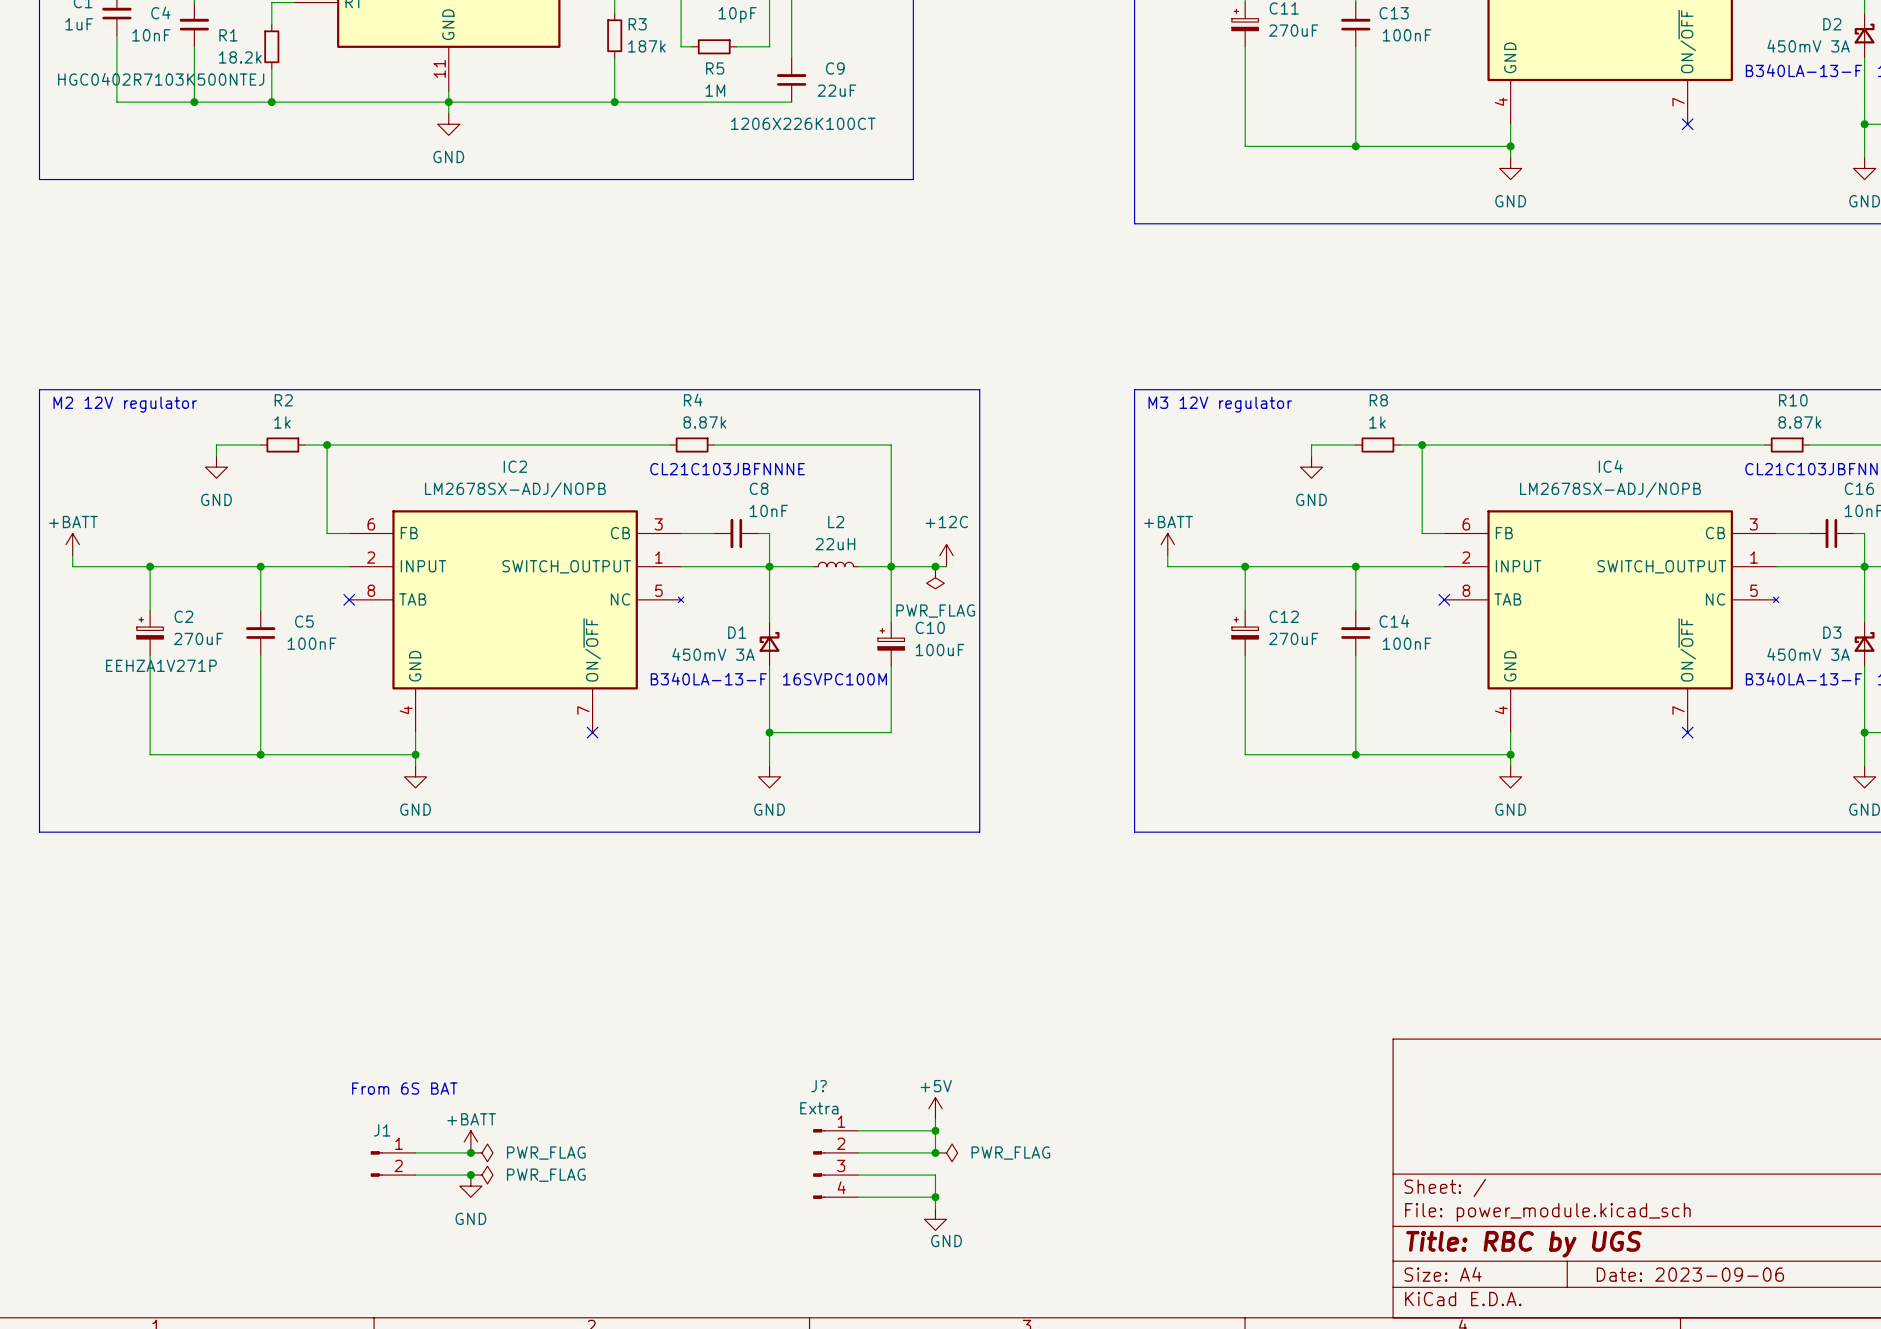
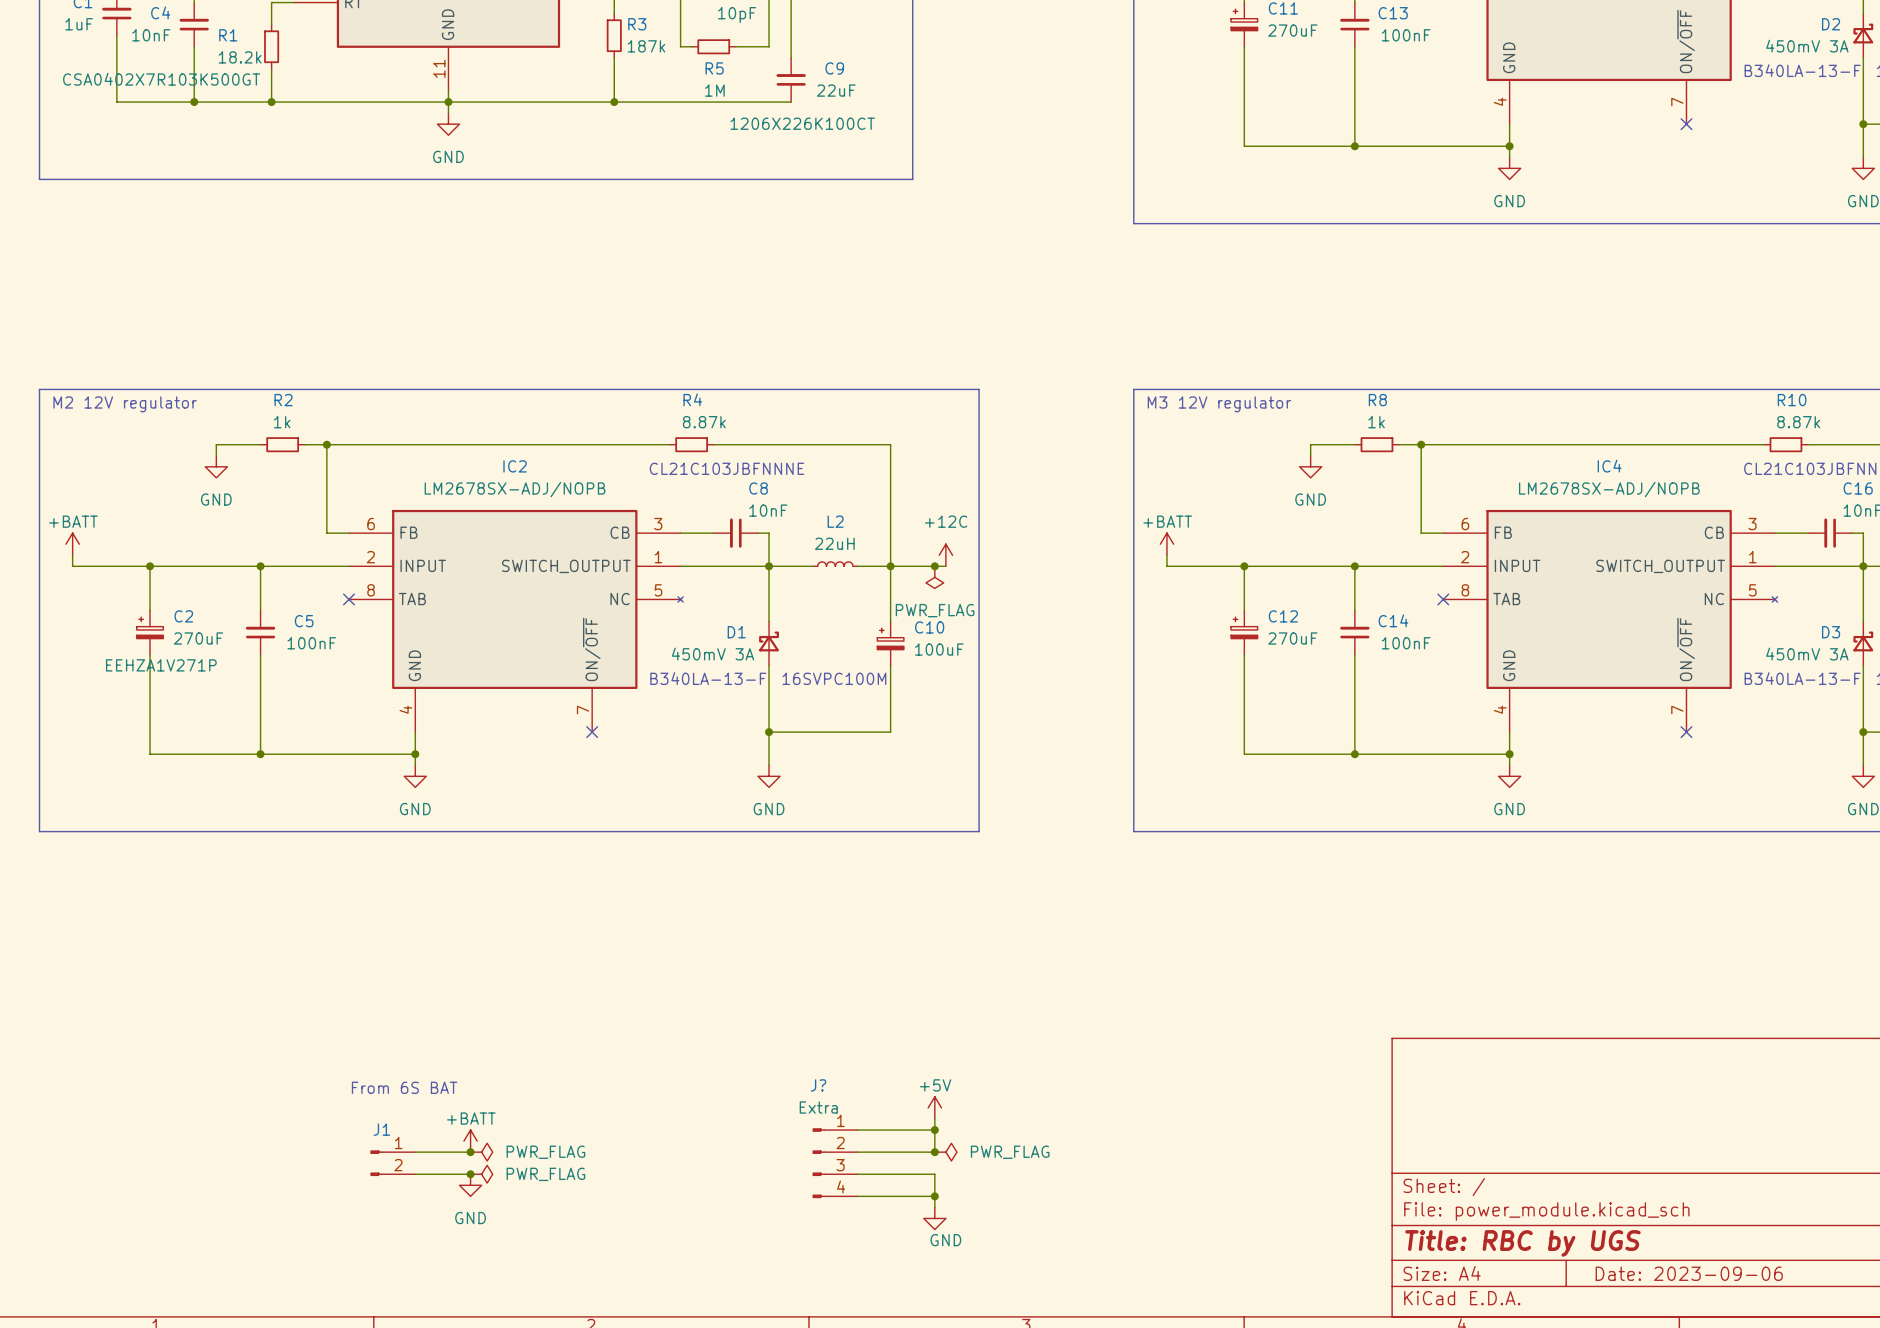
C4 text: HGC0402R7103K500NTEJ (161, 79) -> CSA0402X7R103K500GT (161, 79)

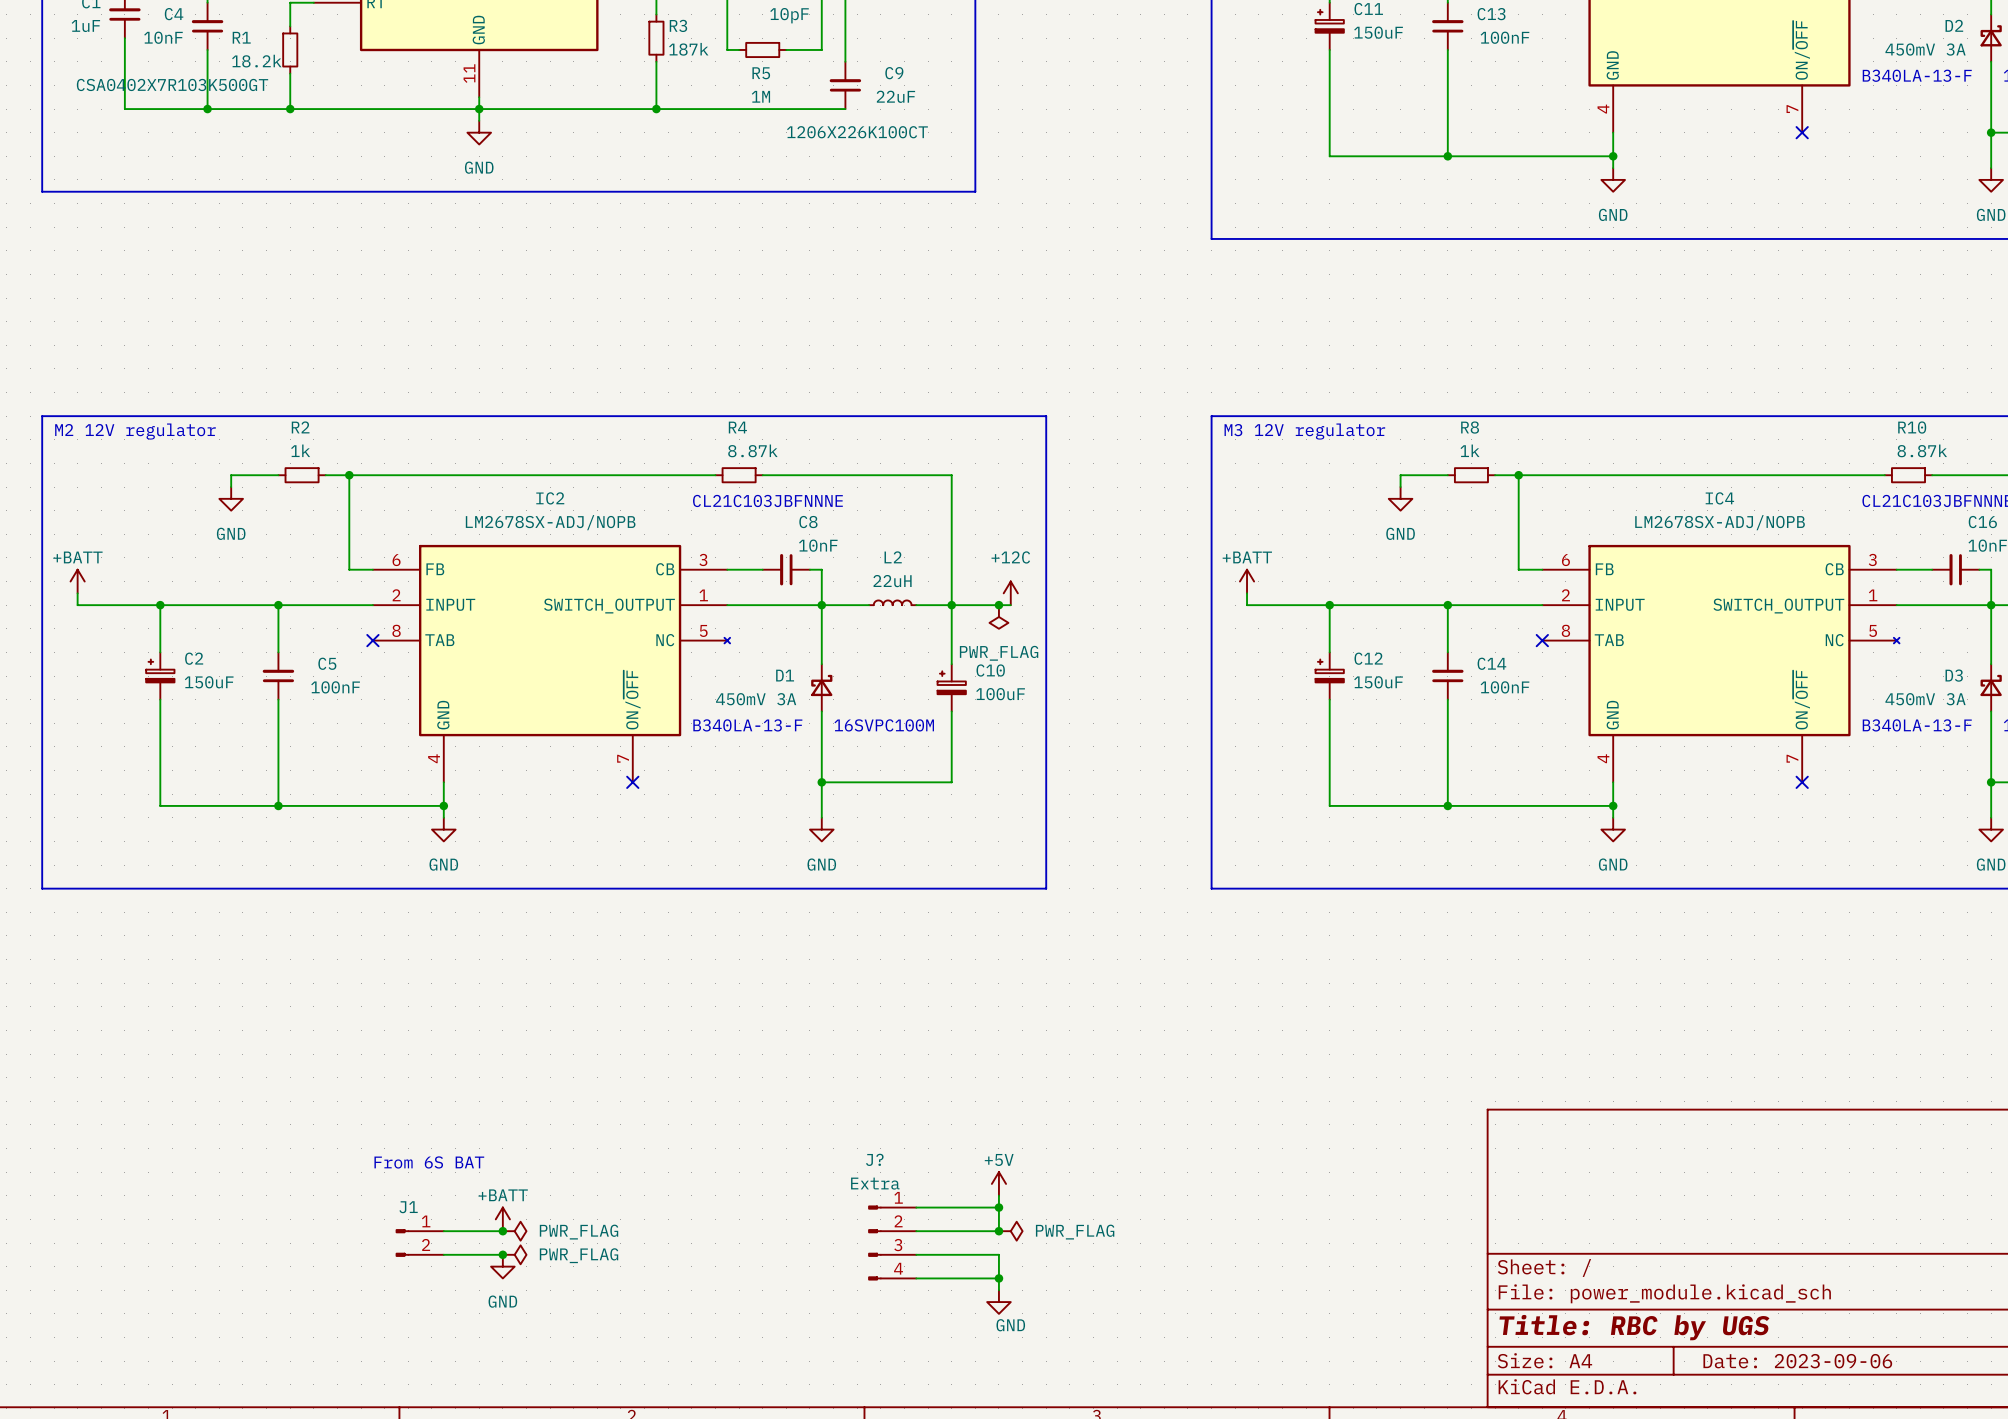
C11 value: 270uF (1292, 30) -> 150uF (1378, 32)
C2 value: 270uF (198, 638) -> 150uF (209, 682)
C12 value: 270uF (1292, 638) -> 150uF (1378, 682)
C2 text: EEHZA1V271P (161, 665) -> none

